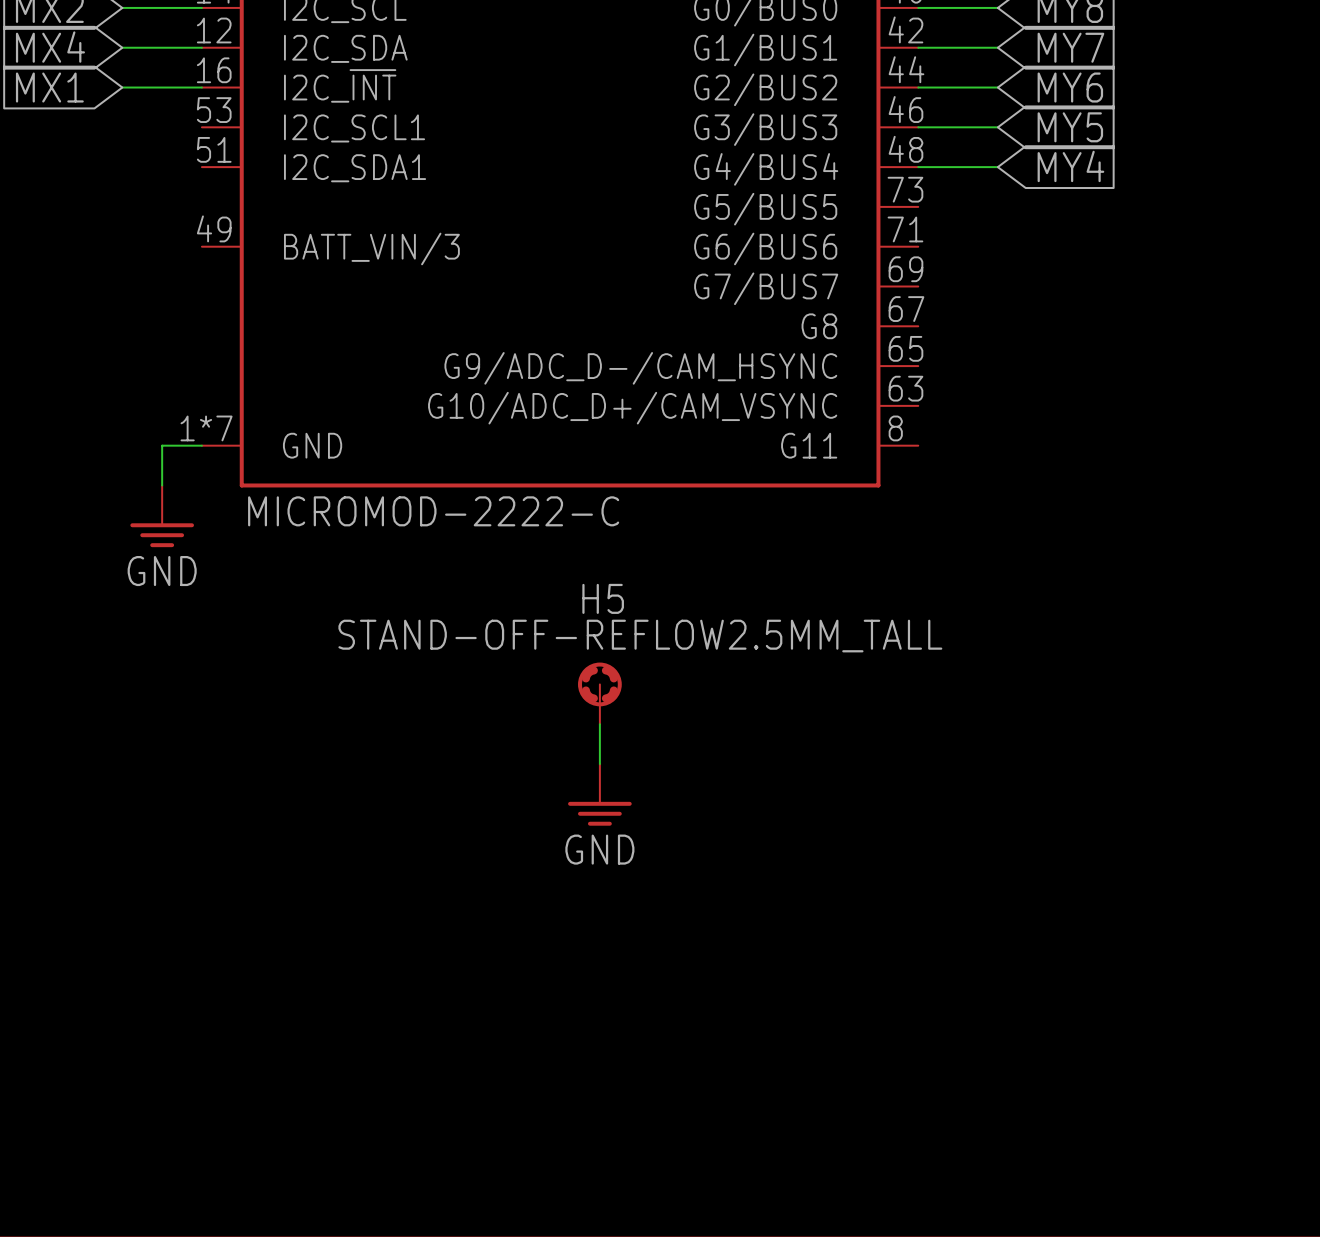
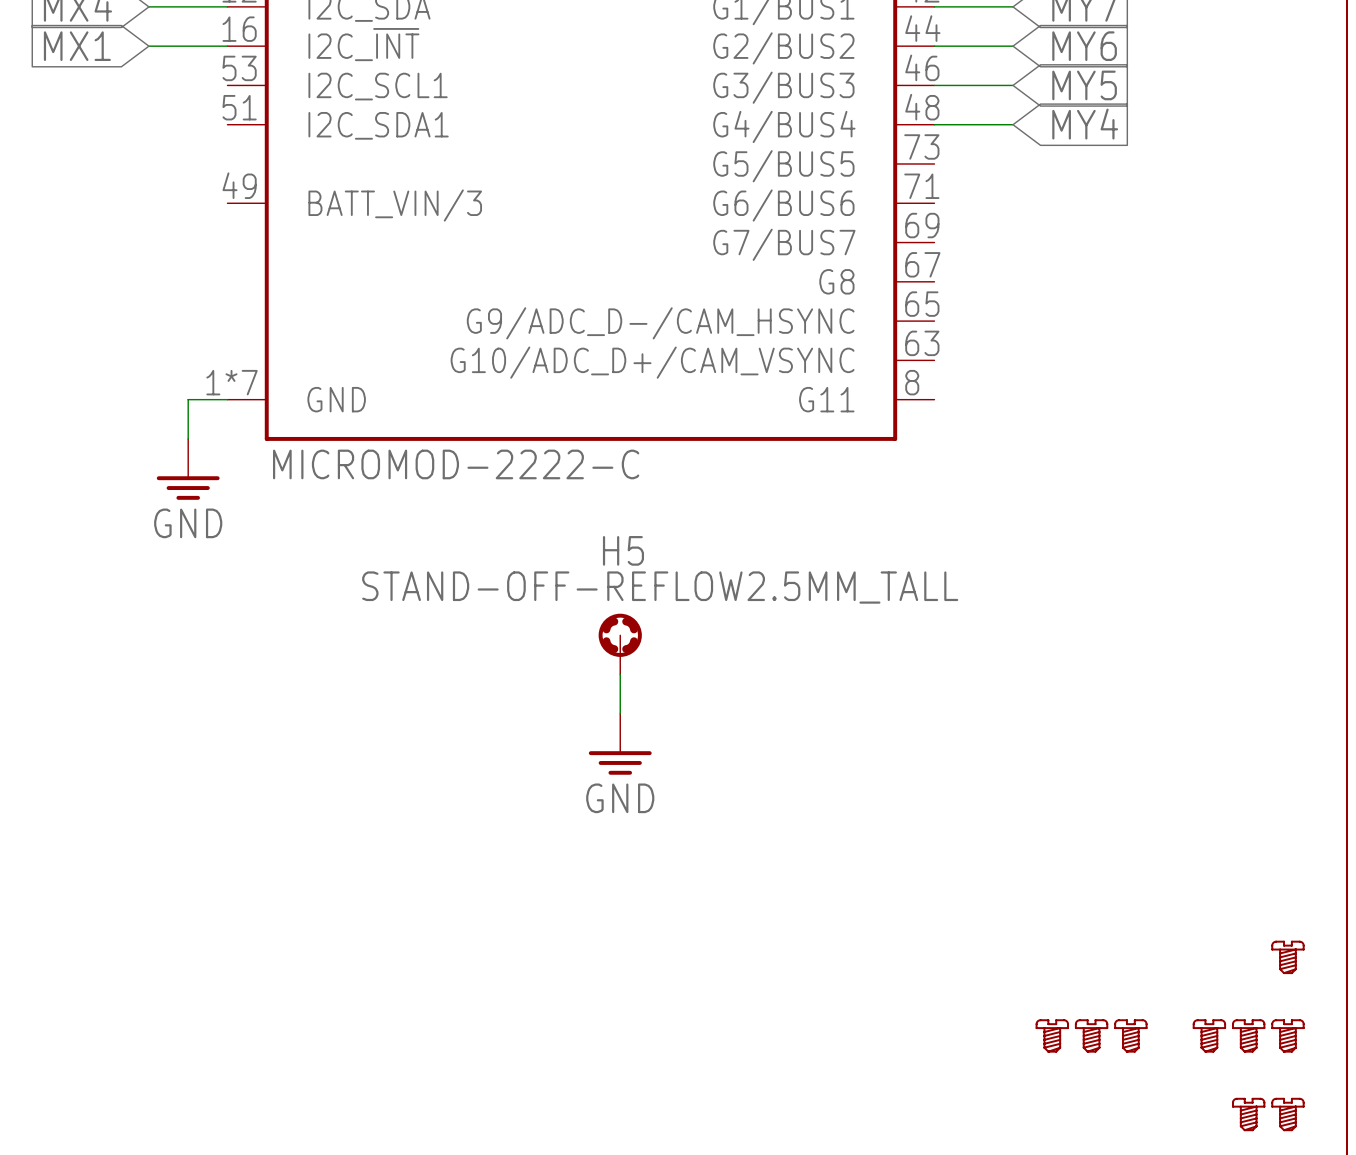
part: none -> (1287, 957)
part: none -> (1052, 1035)
part: none -> (1091, 1035)
part: none -> (1130, 1035)
part: none -> (1209, 1035)
part: none -> (1248, 1035)
part: none -> (1287, 1035)
part: none -> (1248, 1114)
part: none -> (1287, 1114)

